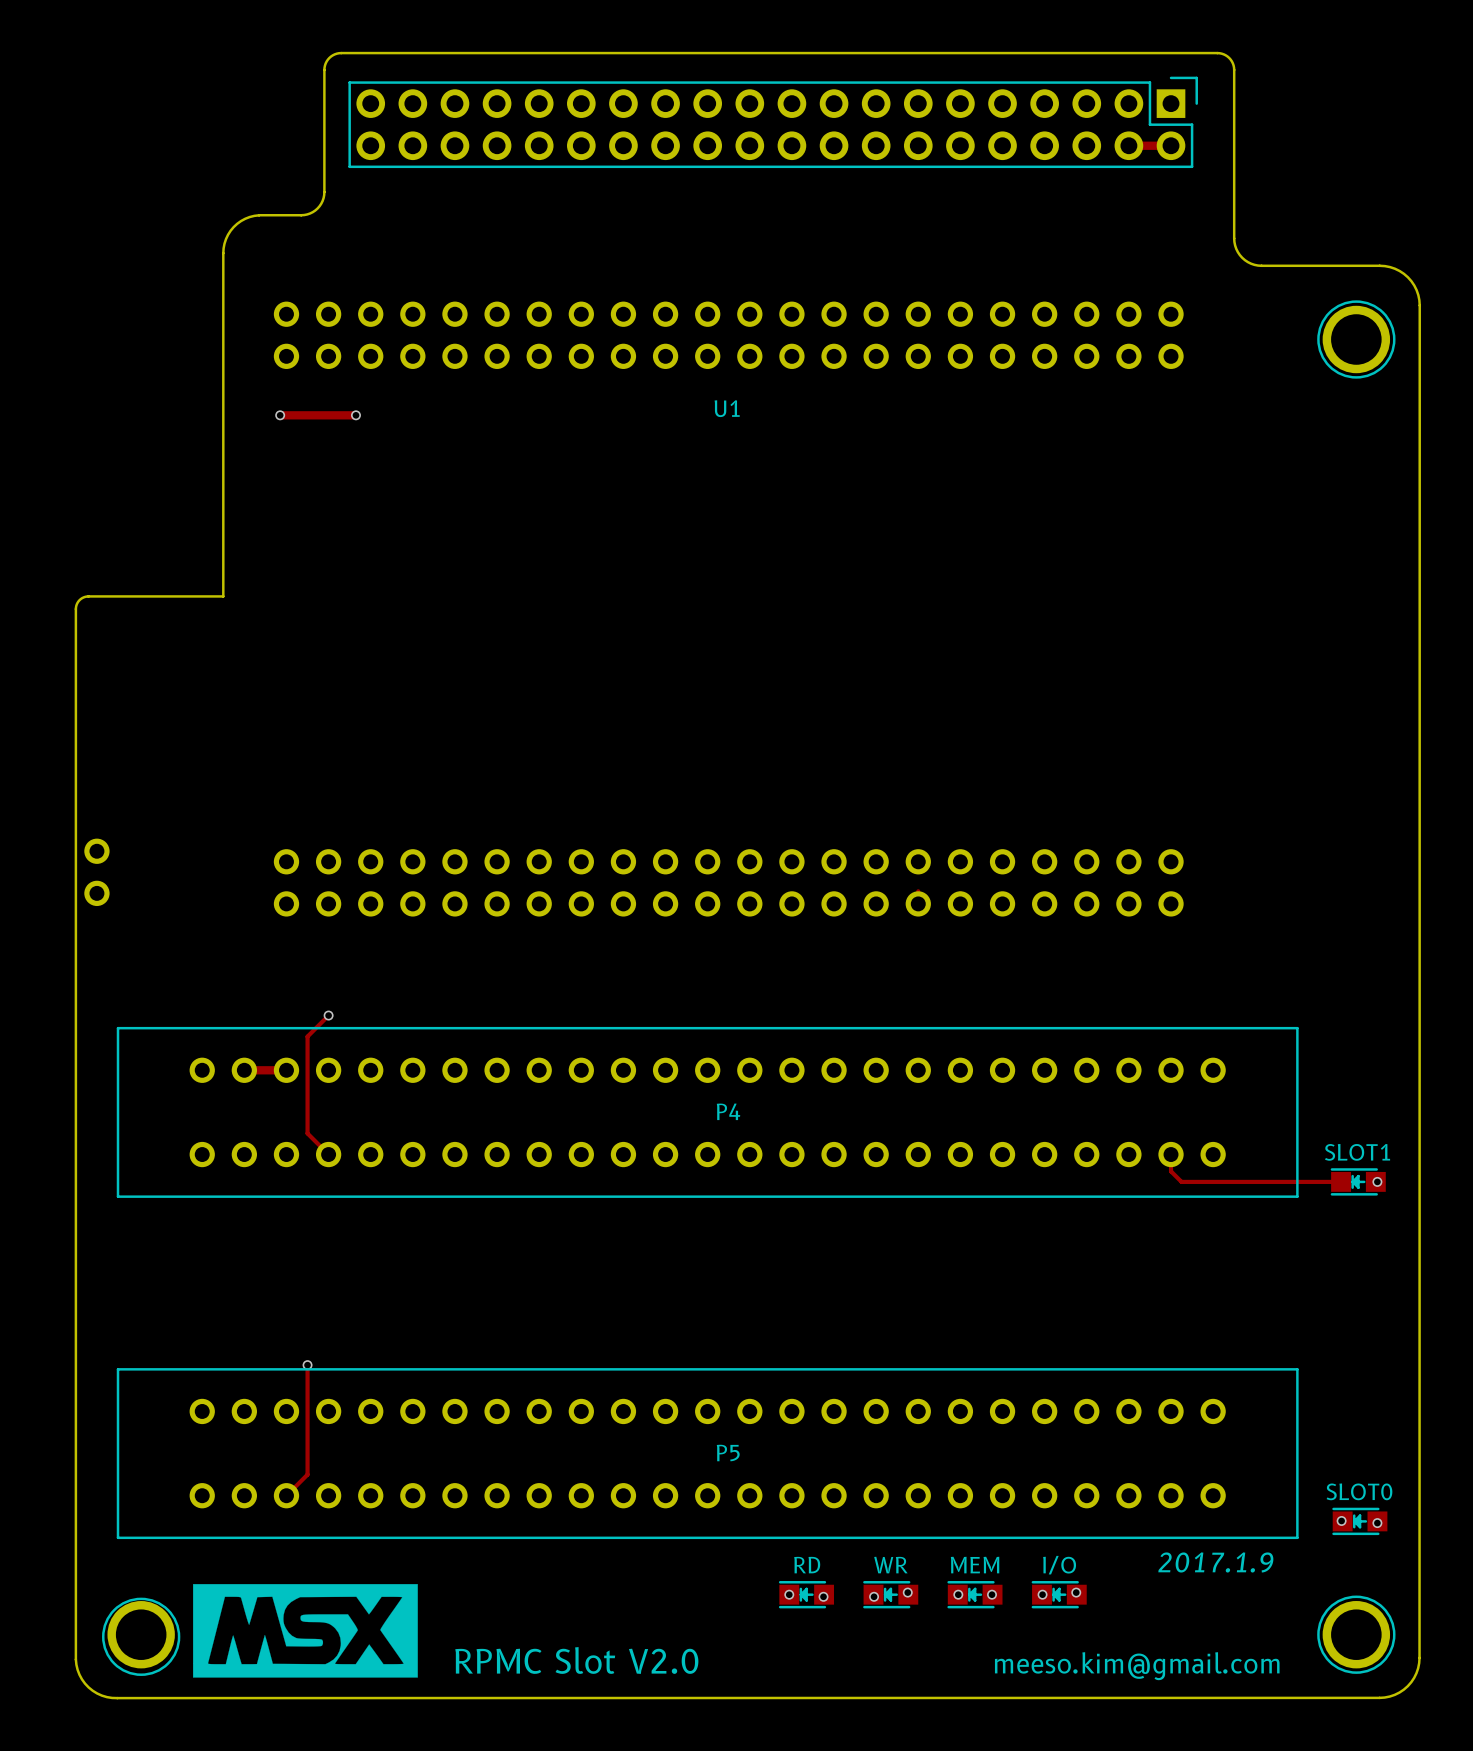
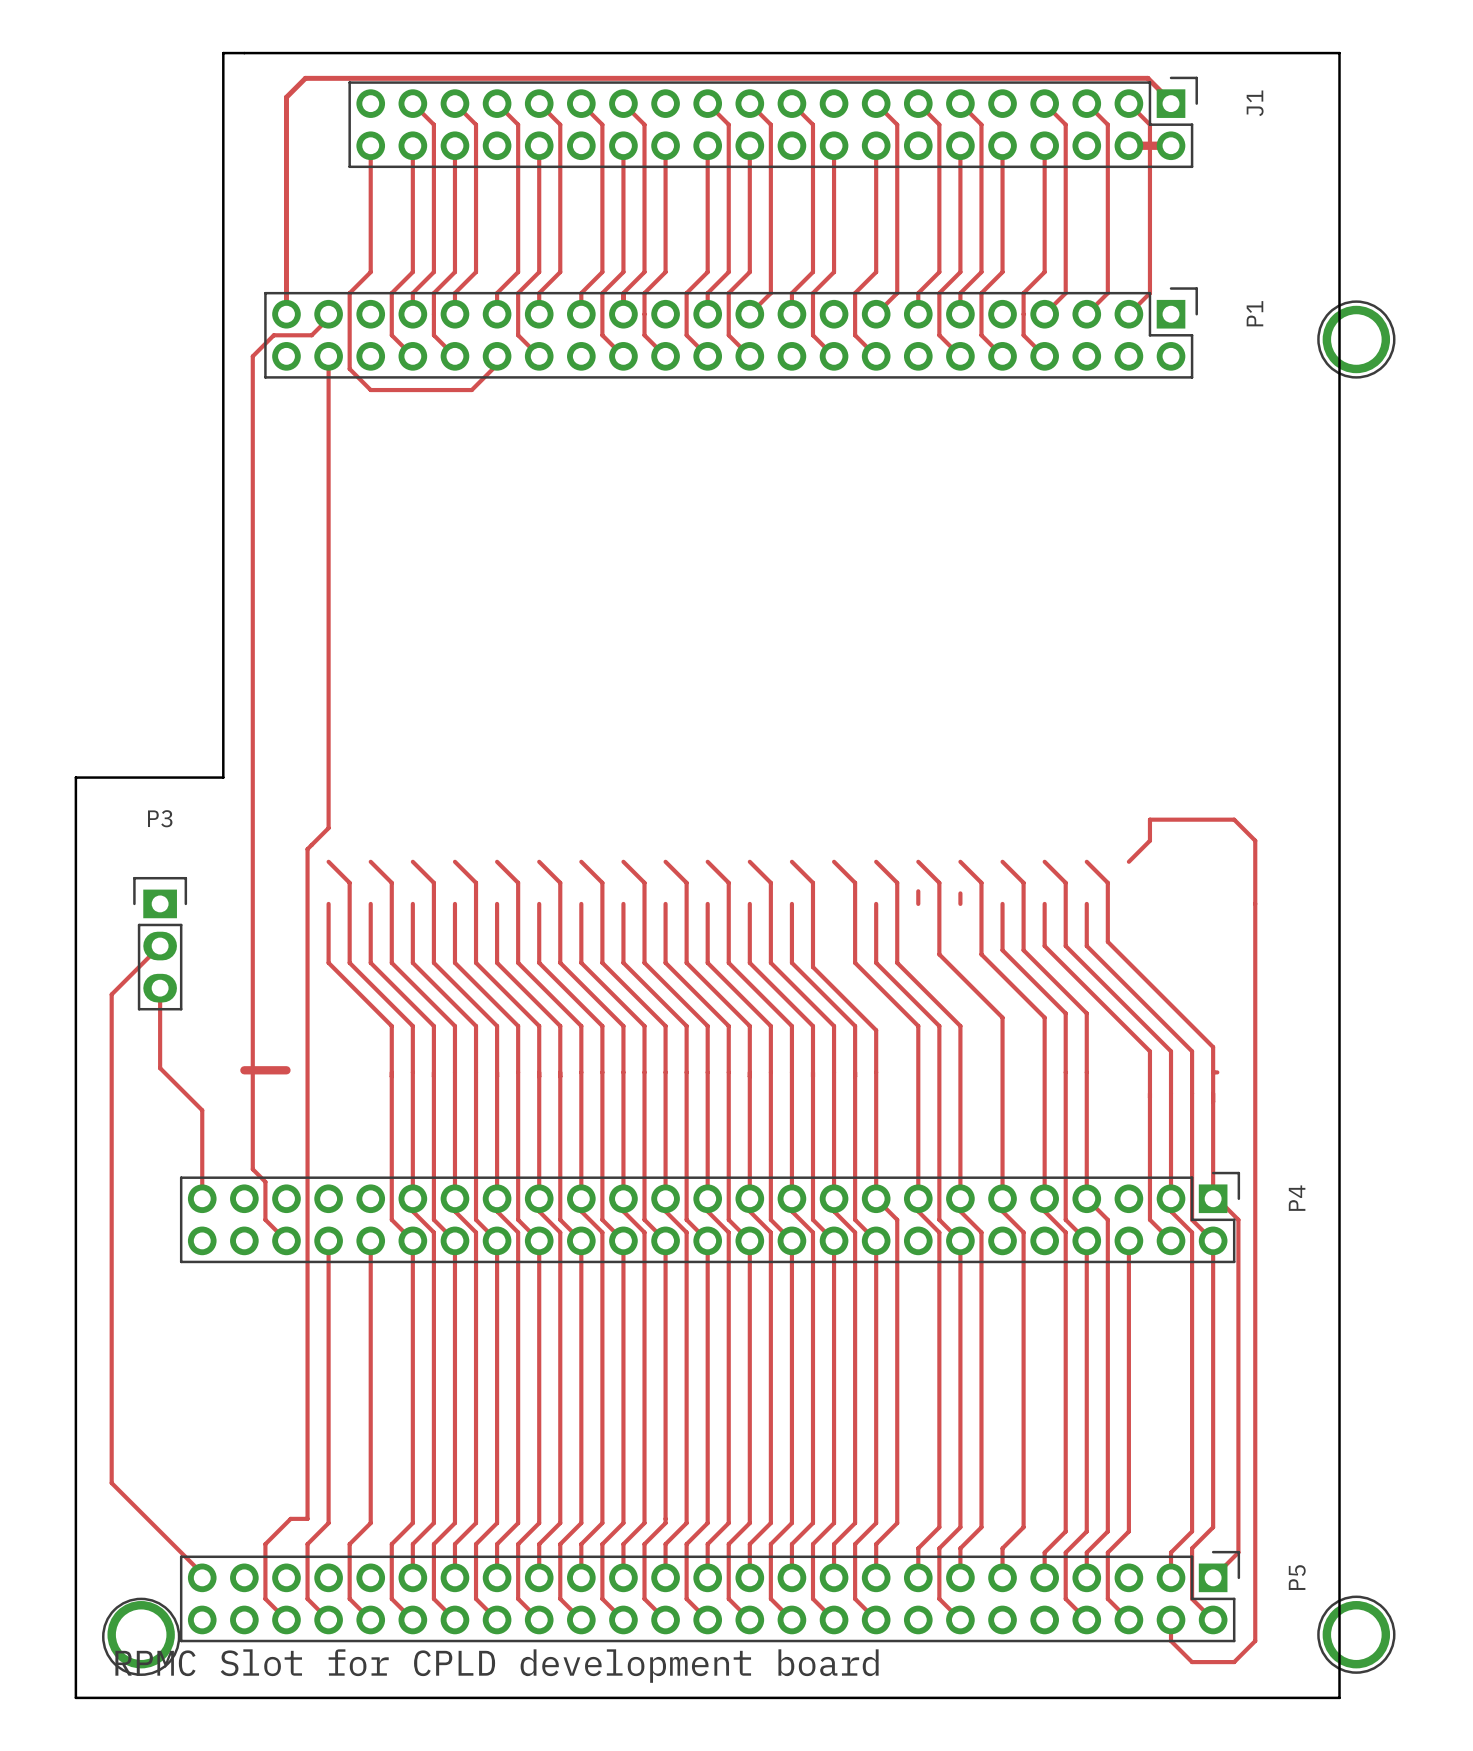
board edge: (341, 53) (329, 58) (324, 67) (324, 192) (321, 203) (315, 210) (304, 215) (259, 215) -> (341, 53) (223, 53) (223, 253)
board edge: (1217, 53) (1229, 58) (1234, 67) (1234, 238) (1239, 255) (1247, 262) (1258, 265) (1390, 267) (1407, 277) (1416, 290) (1419, 300) (1419, 1657) (1416, 1673) (1411, 1682) (1394, 1694) (1379, 1697) (117, 1698) (101, 1695) (88, 1687) (79, 1674) (75, 1659) -> (1217, 53) (1339, 53) (1339, 1697) (75, 1697) (75, 1659)
track: none -> (1171, 101) (1147, 78) (305, 78) (286, 97) (286, 314)
track: none -> (412, 103) (433, 124) (433, 272) (412, 293) (412, 314)
track: none -> (454, 103) (476, 124) (476, 272) (454, 293) (454, 314)
track: none -> (497, 103) (518, 124) (518, 272) (497, 293) (497, 314)
track: none -> (539, 103) (560, 124) (560, 272) (539, 293) (539, 314)
track: none -> (581, 103) (602, 124) (602, 272) (581, 293) (581, 314)
track: none -> (623, 103) (644, 124) (644, 272) (623, 293) (623, 314)
track: none -> (707, 103) (728, 124) (728, 272) (707, 293) (707, 314)
track: none -> (749, 103) (770, 124) (770, 293) (749, 314)
track: none -> (791, 103) (812, 124) (812, 272) (791, 293) (791, 314)
track: none -> (876, 103) (897, 124) (897, 293) (876, 314)
track: none -> (918, 103) (939, 124) (939, 272) (918, 293) (918, 314)
track: none -> (960, 103) (981, 124) (981, 272) (960, 293) (960, 314)
track: none -> (1044, 103) (1065, 124) (1065, 293) (1044, 314)
track: none -> (1086, 103) (1107, 124) (1107, 293) (1086, 314)
track: none -> (1128, 103) (1149, 124) (1149, 293) (1128, 314)
J1 name: none -> J1 (1255, 103)
track: none -> (370, 145) (370, 272) (349, 293) (349, 368) (370, 390) (471, 390) (497, 364)
track: none -> (412, 145) (412, 272) (391, 293) (391, 335) (412, 356)
track: none -> (454, 145) (454, 272) (433, 293) (433, 335) (454, 356)
track: none -> (539, 145) (539, 272) (518, 293) (518, 335) (539, 356)
track: none -> (623, 145) (623, 272) (602, 293) (602, 335) (623, 356)
track: none -> (665, 145) (665, 272) (644, 293) (644, 335) (665, 356)
track: none -> (707, 145) (707, 272) (686, 293) (686, 335) (707, 356)
track: none -> (749, 145) (749, 272) (728, 293) (728, 335) (749, 356)
track: none -> (834, 145) (834, 272) (812, 293) (812, 335) (834, 356)
track: none -> (876, 145) (876, 272) (855, 293) (855, 335) (876, 356)
track: none -> (960, 145) (960, 272) (939, 293) (939, 335) (960, 356)
track: none -> (1002, 145) (1002, 272) (981, 293) (981, 335) (1002, 356)
track: none -> (1044, 145) (1044, 272) (1023, 293) (1023, 335) (1044, 356)
board edge: (259, 215) (245, 218) (233, 227) (225, 239) (223, 253) -> none
track: none -> (328, 318) (311, 335) (273, 335) (252, 356) (252, 1169) (265, 1181) (265, 1219) (286, 1240)
P1: none -> (731, 332)
track: (280, 415) (355, 415) -> none
via: (280, 415) -> none
via: (355, 415) -> none
board edge: (223, 596) (88, 596) (78, 601) (75, 609) (75, 777) -> (223, 596) (223, 777) (75, 777)
U1: (633, 609) -> none
track: none -> (328, 861) (349, 882) (349, 962) (412, 1026) (412, 1211) (433, 1232) (433, 1523) (412, 1544) (412, 1577)
track: none -> (370, 861) (391, 882) (391, 962) (454, 1026) (454, 1211) (476, 1232) (476, 1523) (454, 1544) (454, 1577)
track: none -> (412, 861) (433, 882) (433, 962) (497, 1026) (497, 1211) (518, 1232) (518, 1523) (497, 1544) (497, 1577)
track: none -> (454, 861) (476, 882) (476, 962) (539, 1026) (539, 1211) (560, 1232) (560, 1523) (539, 1544) (539, 1577)
track: none -> (497, 861) (518, 882) (518, 962) (581, 1026) (581, 1211) (602, 1232) (602, 1523) (581, 1544) (581, 1577)
track: none -> (539, 861) (560, 882) (560, 962) (623, 1026) (623, 1211) (644, 1232) (644, 1523) (623, 1544) (623, 1577)
track: none -> (581, 861) (602, 882) (602, 962) (665, 1026) (665, 1211) (686, 1232) (686, 1523) (665, 1544) (665, 1577)
track: none -> (623, 861) (644, 882) (644, 962) (707, 1026) (707, 1211) (728, 1232) (728, 1523) (707, 1544) (707, 1577)
track: none -> (665, 861) (686, 882) (686, 962) (749, 1026) (749, 1211) (770, 1232) (770, 1523) (749, 1544) (749, 1577)
track: none -> (707, 861) (728, 882) (728, 962) (791, 1026) (791, 1211) (812, 1232) (812, 1523) (791, 1544) (791, 1577)
track: none -> (749, 861) (770, 882) (770, 962) (834, 1026) (834, 1211) (855, 1232) (855, 1523) (834, 1544) (834, 1577)
track: none -> (791, 861) (812, 882) (812, 967) (876, 1030) (876, 1198) (897, 1219) (897, 1523) (876, 1544) (876, 1577)
track: none -> (834, 861) (855, 882) (855, 962) (918, 1026) (918, 1211) (939, 1232) (939, 1527) (918, 1548) (918, 1577)
track: none -> (876, 861) (897, 882) (897, 962) (960, 1026) (960, 1211) (981, 1232) (981, 1527) (960, 1548) (960, 1577)
track: none -> (918, 861) (939, 882) (939, 954) (1002, 1017) (1002, 1211) (1023, 1232) (1023, 1527) (1002, 1548) (1002, 1577)
track: none -> (960, 861) (981, 882) (981, 954) (1044, 1017) (1044, 1211) (1065, 1232) (1065, 1531) (1044, 1552) (1044, 1577)
track: none -> (1002, 861) (1023, 882) (1023, 950) (1086, 1013) (1086, 1198) (1107, 1219) (1107, 1531) (1086, 1552) (1086, 1577)
track: none -> (1044, 861) (1065, 882) (1065, 946) (1171, 1051) (1171, 1154)
track: none -> (1086, 861) (1107, 882) (1107, 941) (1213, 1047) (1213, 1198) (1217, 1198) (1238, 1219) (1238, 1552) (1213, 1577)
track: none -> (1128, 861) (1149, 840) (1149, 819) (1234, 819) (1255, 840) (1255, 1641) (1234, 1662) (1192, 1662) (1171, 1641) (1171, 1619)
track: none -> (328, 903) (328, 962) (391, 1026) (391, 1219) (412, 1240) (412, 1523) (391, 1544) (391, 1598) (412, 1619)
track: none -> (370, 903) (370, 962) (433, 1026) (433, 1219) (454, 1240) (454, 1523) (433, 1544) (433, 1598) (454, 1619)
track: none -> (412, 903) (412, 962) (476, 1026) (476, 1219) (497, 1240) (497, 1523) (476, 1544) (476, 1598) (497, 1619)
track: none -> (454, 903) (454, 962) (518, 1026) (518, 1219) (539, 1240) (539, 1523) (518, 1544) (518, 1598) (539, 1619)
track: none -> (497, 903) (497, 962) (560, 1026) (560, 1219) (581, 1240) (581, 1523) (560, 1544) (560, 1598) (581, 1619)
track: none -> (539, 903) (539, 962) (602, 1026) (602, 1219) (623, 1240) (623, 1523) (602, 1544) (602, 1598) (623, 1619)
track: none -> (581, 903) (581, 962) (644, 1026) (644, 1219) (665, 1240) (665, 1523) (644, 1544) (644, 1598) (665, 1619)
track: none -> (623, 903) (623, 962) (686, 1026) (686, 1219) (707, 1240) (707, 1523) (686, 1544) (686, 1598) (707, 1619)
track: none -> (665, 903) (665, 962) (728, 1026) (728, 1219) (749, 1240) (749, 1523) (728, 1544) (728, 1598) (749, 1619)
track: none -> (707, 903) (707, 962) (770, 1026) (770, 1219) (791, 1240) (791, 1523) (770, 1544) (770, 1598) (791, 1619)
track: none -> (749, 903) (749, 962) (812, 1026) (812, 1219) (834, 1240) (834, 1523) (812, 1544) (812, 1598) (834, 1619)
track: none -> (791, 903) (791, 962) (855, 1026) (855, 1219) (876, 1240) (876, 1523) (855, 1544) (855, 1598) (876, 1619)
track: none -> (876, 903) (876, 962) (939, 1026) (939, 1219) (960, 1240) (960, 1495)
track: none -> (1002, 903) (1002, 950) (1065, 1013) (1065, 1219) (1086, 1240) (1086, 1531) (1065, 1552) (1065, 1598) (1086, 1619)
track: none -> (1044, 903) (1044, 946) (1149, 1051) (1149, 1219) (1171, 1240)
track: none -> (1086, 903) (1086, 946) (1192, 1051) (1192, 1219) (1213, 1240) (1213, 1527) (1192, 1548) (1192, 1598) (1213, 1619)
P3: none -> (160, 943)
track: none -> (160, 946) (111, 994) (111, 1483) (202, 1573) (202, 1577)
track: none -> (160, 988) (160, 1068) (202, 1110) (202, 1198)
track: (328, 1015) (307, 1036) -> (328, 356) (328, 828) (307, 849) (307, 1036)
via: (328, 1015) -> none
P4 footprint: [116, 1026, 1299, 1198] -> [179, 1171, 1241, 1264]
P4 name position: P4 (728, 1111) -> P4 (1297, 1198)
track: (307, 1133) (328, 1154) -> (307, 1133) (307, 1365)
track: (1171, 1171) (1181, 1181) (1341, 1181) -> (1171, 1171) (1171, 1211) (1192, 1232) (1192, 1531) (1171, 1552) (1171, 1577)
SLOT1: (1358, 1181) -> none
via: (1377, 1181) -> none
track: none -> (328, 1240) (328, 1523) (307, 1544) (307, 1598) (328, 1619)
track: none -> (370, 1240) (370, 1523) (349, 1544) (349, 1598) (370, 1619)
track: none -> (1128, 1240) (1128, 1531) (1107, 1552) (1107, 1598) (1128, 1619)
via: (307, 1365) -> none
P5 footprint: [116, 1368, 1299, 1540] -> [179, 1550, 1241, 1643]
P5 name position: P5 (728, 1453) -> P5 (1297, 1577)
track: (307, 1474) (286, 1495) -> (307, 1474) (307, 1518) (290, 1518) (265, 1544) (265, 1598) (286, 1619)
track: none -> (960, 1499) (960, 1527) (939, 1548) (939, 1598) (960, 1619)
via: (1341, 1520) -> none
SLOT0: (1359, 1521) -> none
via: (1377, 1523) -> none
text: 2017.1.9 (1215, 1562) -> none
drawing: [193, 1584, 418, 1678] -> none
via: (907, 1592) -> none
via: (1076, 1592) -> none
via: (789, 1594) -> none
RD: (806, 1594) -> none
WR: (890, 1594) -> none
via: (958, 1594) -> none
MEM: (974, 1594) -> none
via: (992, 1594) -> none
via: (1042, 1594) -> none
I/O: (1059, 1594) -> none
via: (823, 1596) -> none
via: (874, 1596) -> none
text: RPMC Slot V2.0 (576, 1660) -> none
text: none -> RPMC Slot for CPLD development board (497, 1666)
text: meeso.kim@gmail.com (1137, 1666) -> none

